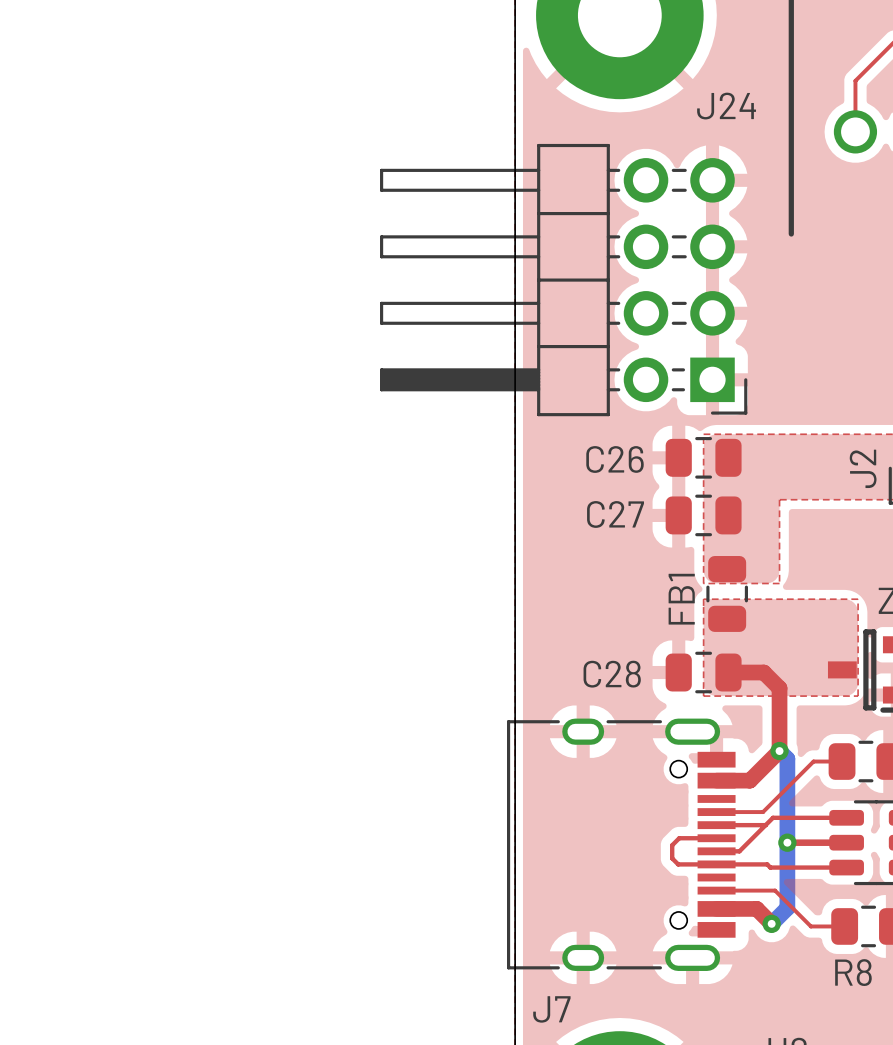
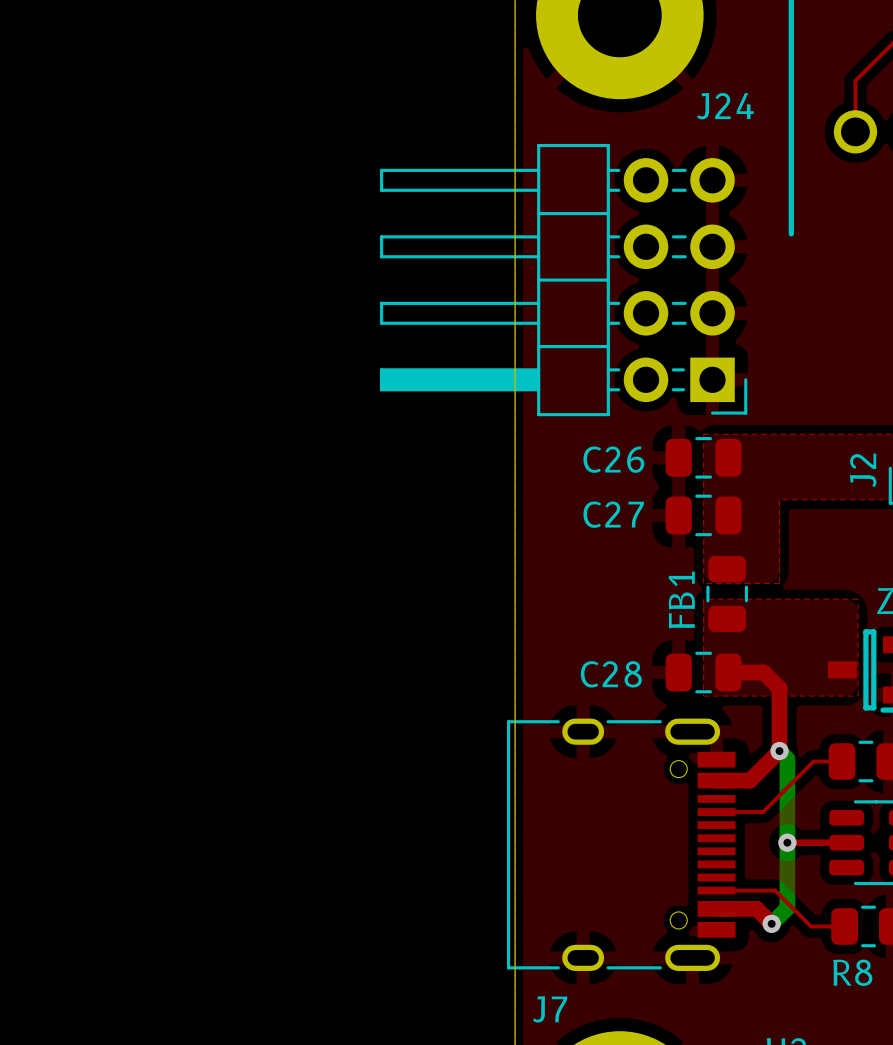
top track: (846, 817) (772, 817) (739, 851) (716, 851) -> none
top track: (716, 825) (765, 825) -> none
top track: (716, 838) (679, 838) (672, 845) (672, 858) (678, 864) (767, 864) (770, 867) (846, 867) -> none

